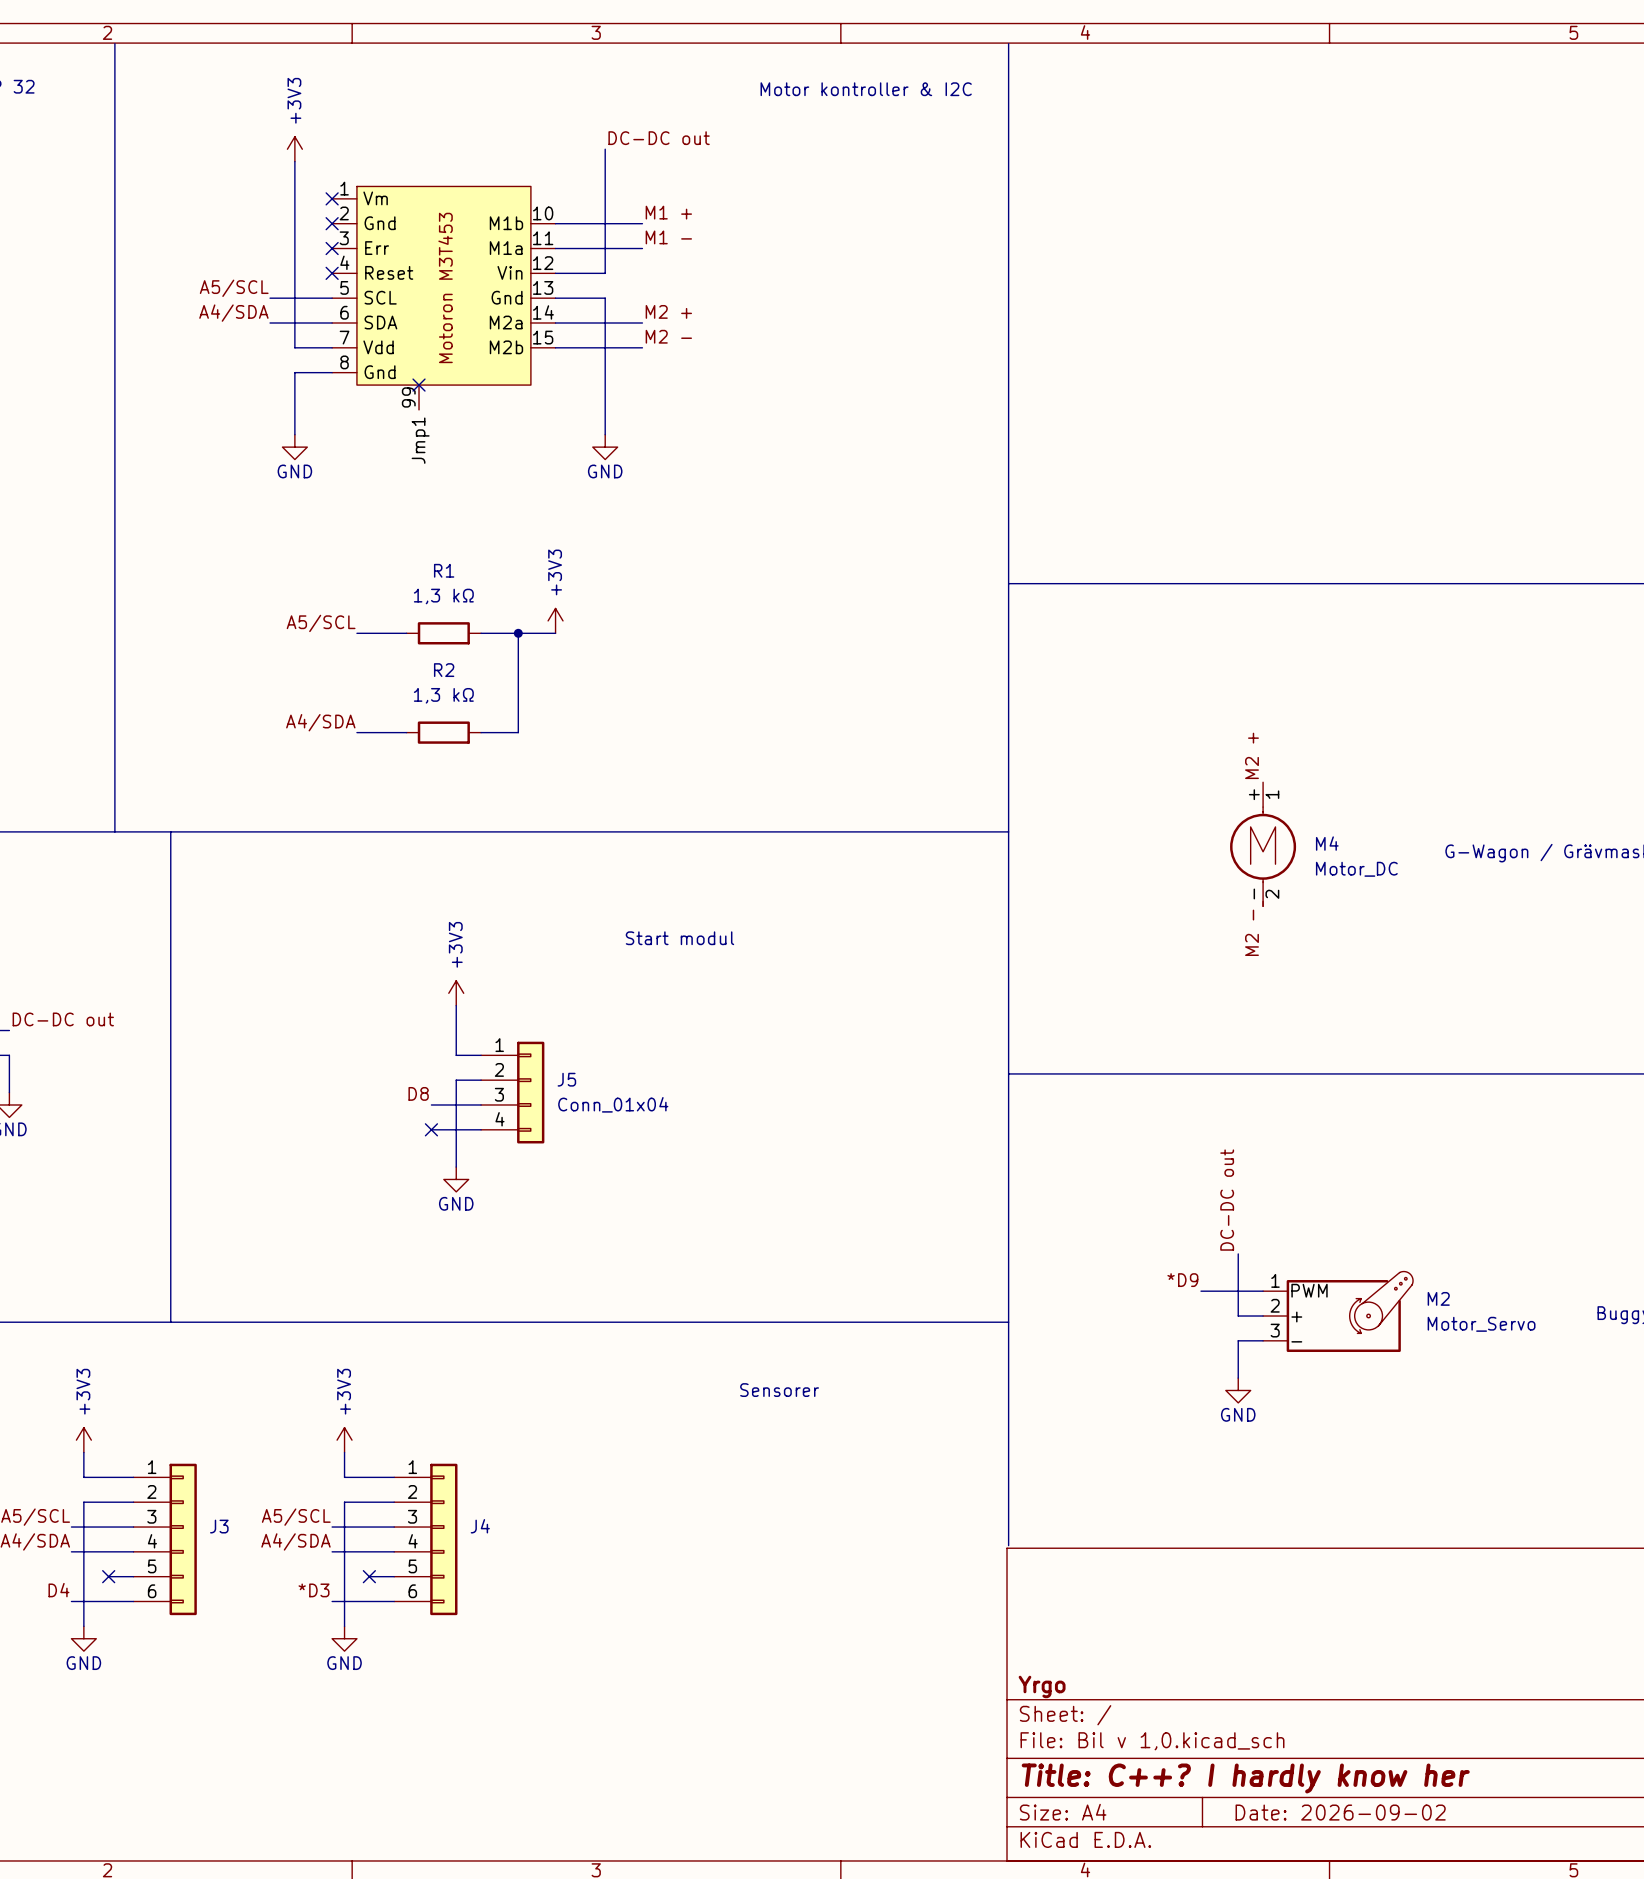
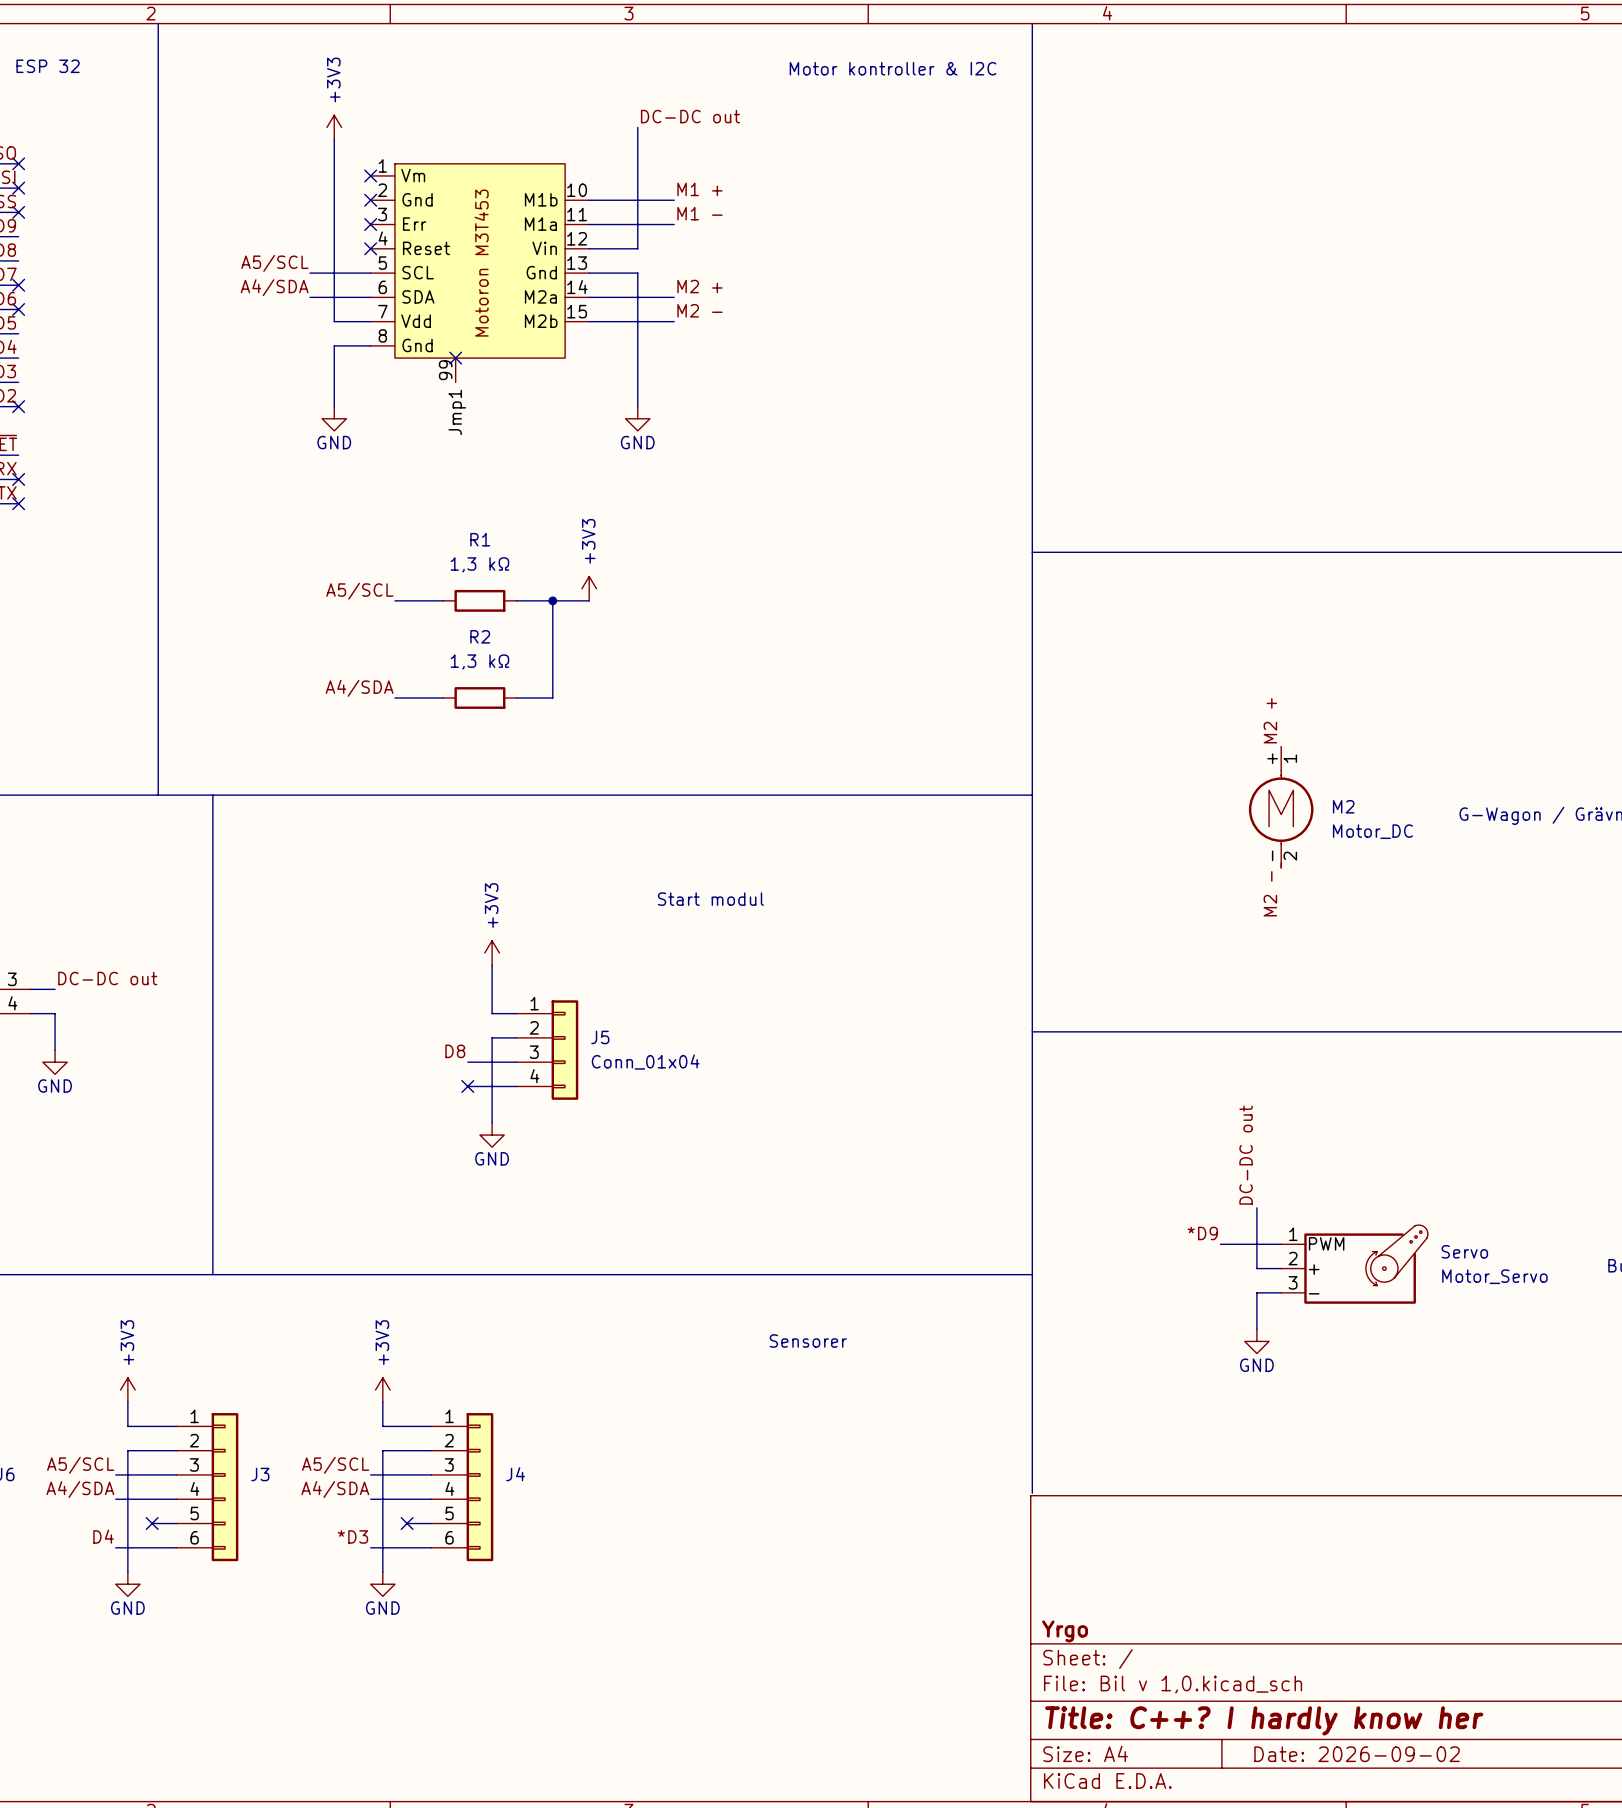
M4 name: M4 (1327, 843) -> M2 (1343, 806)
M2 name: M2 (1438, 1298) -> Servo (1464, 1251)

